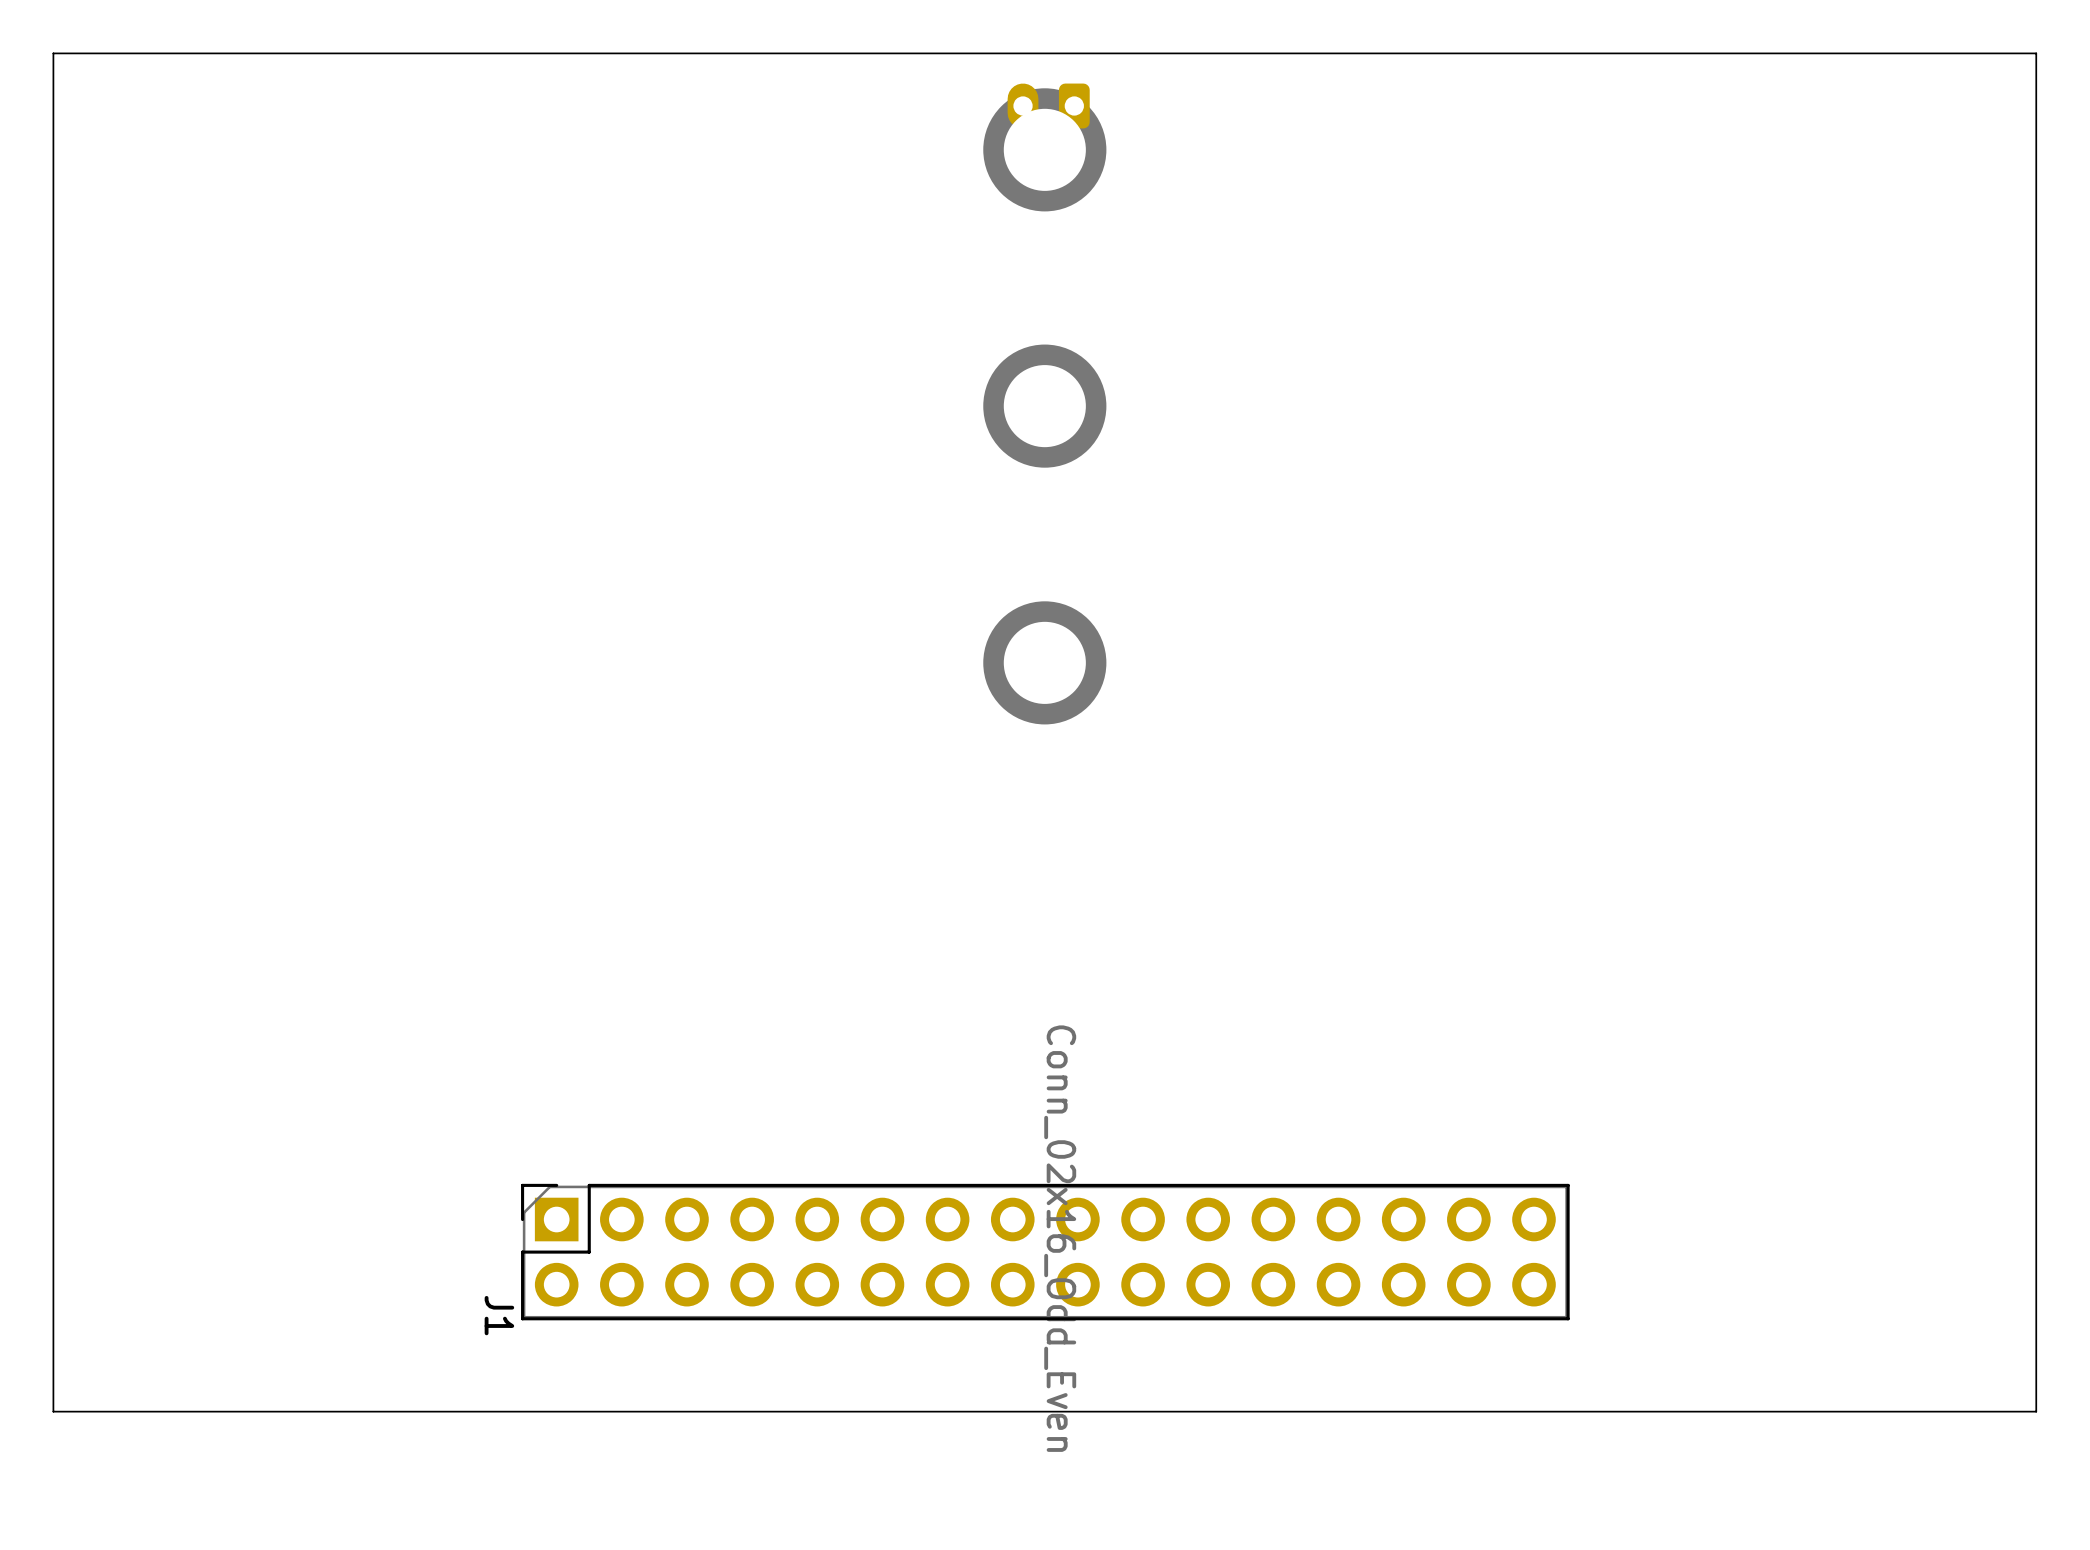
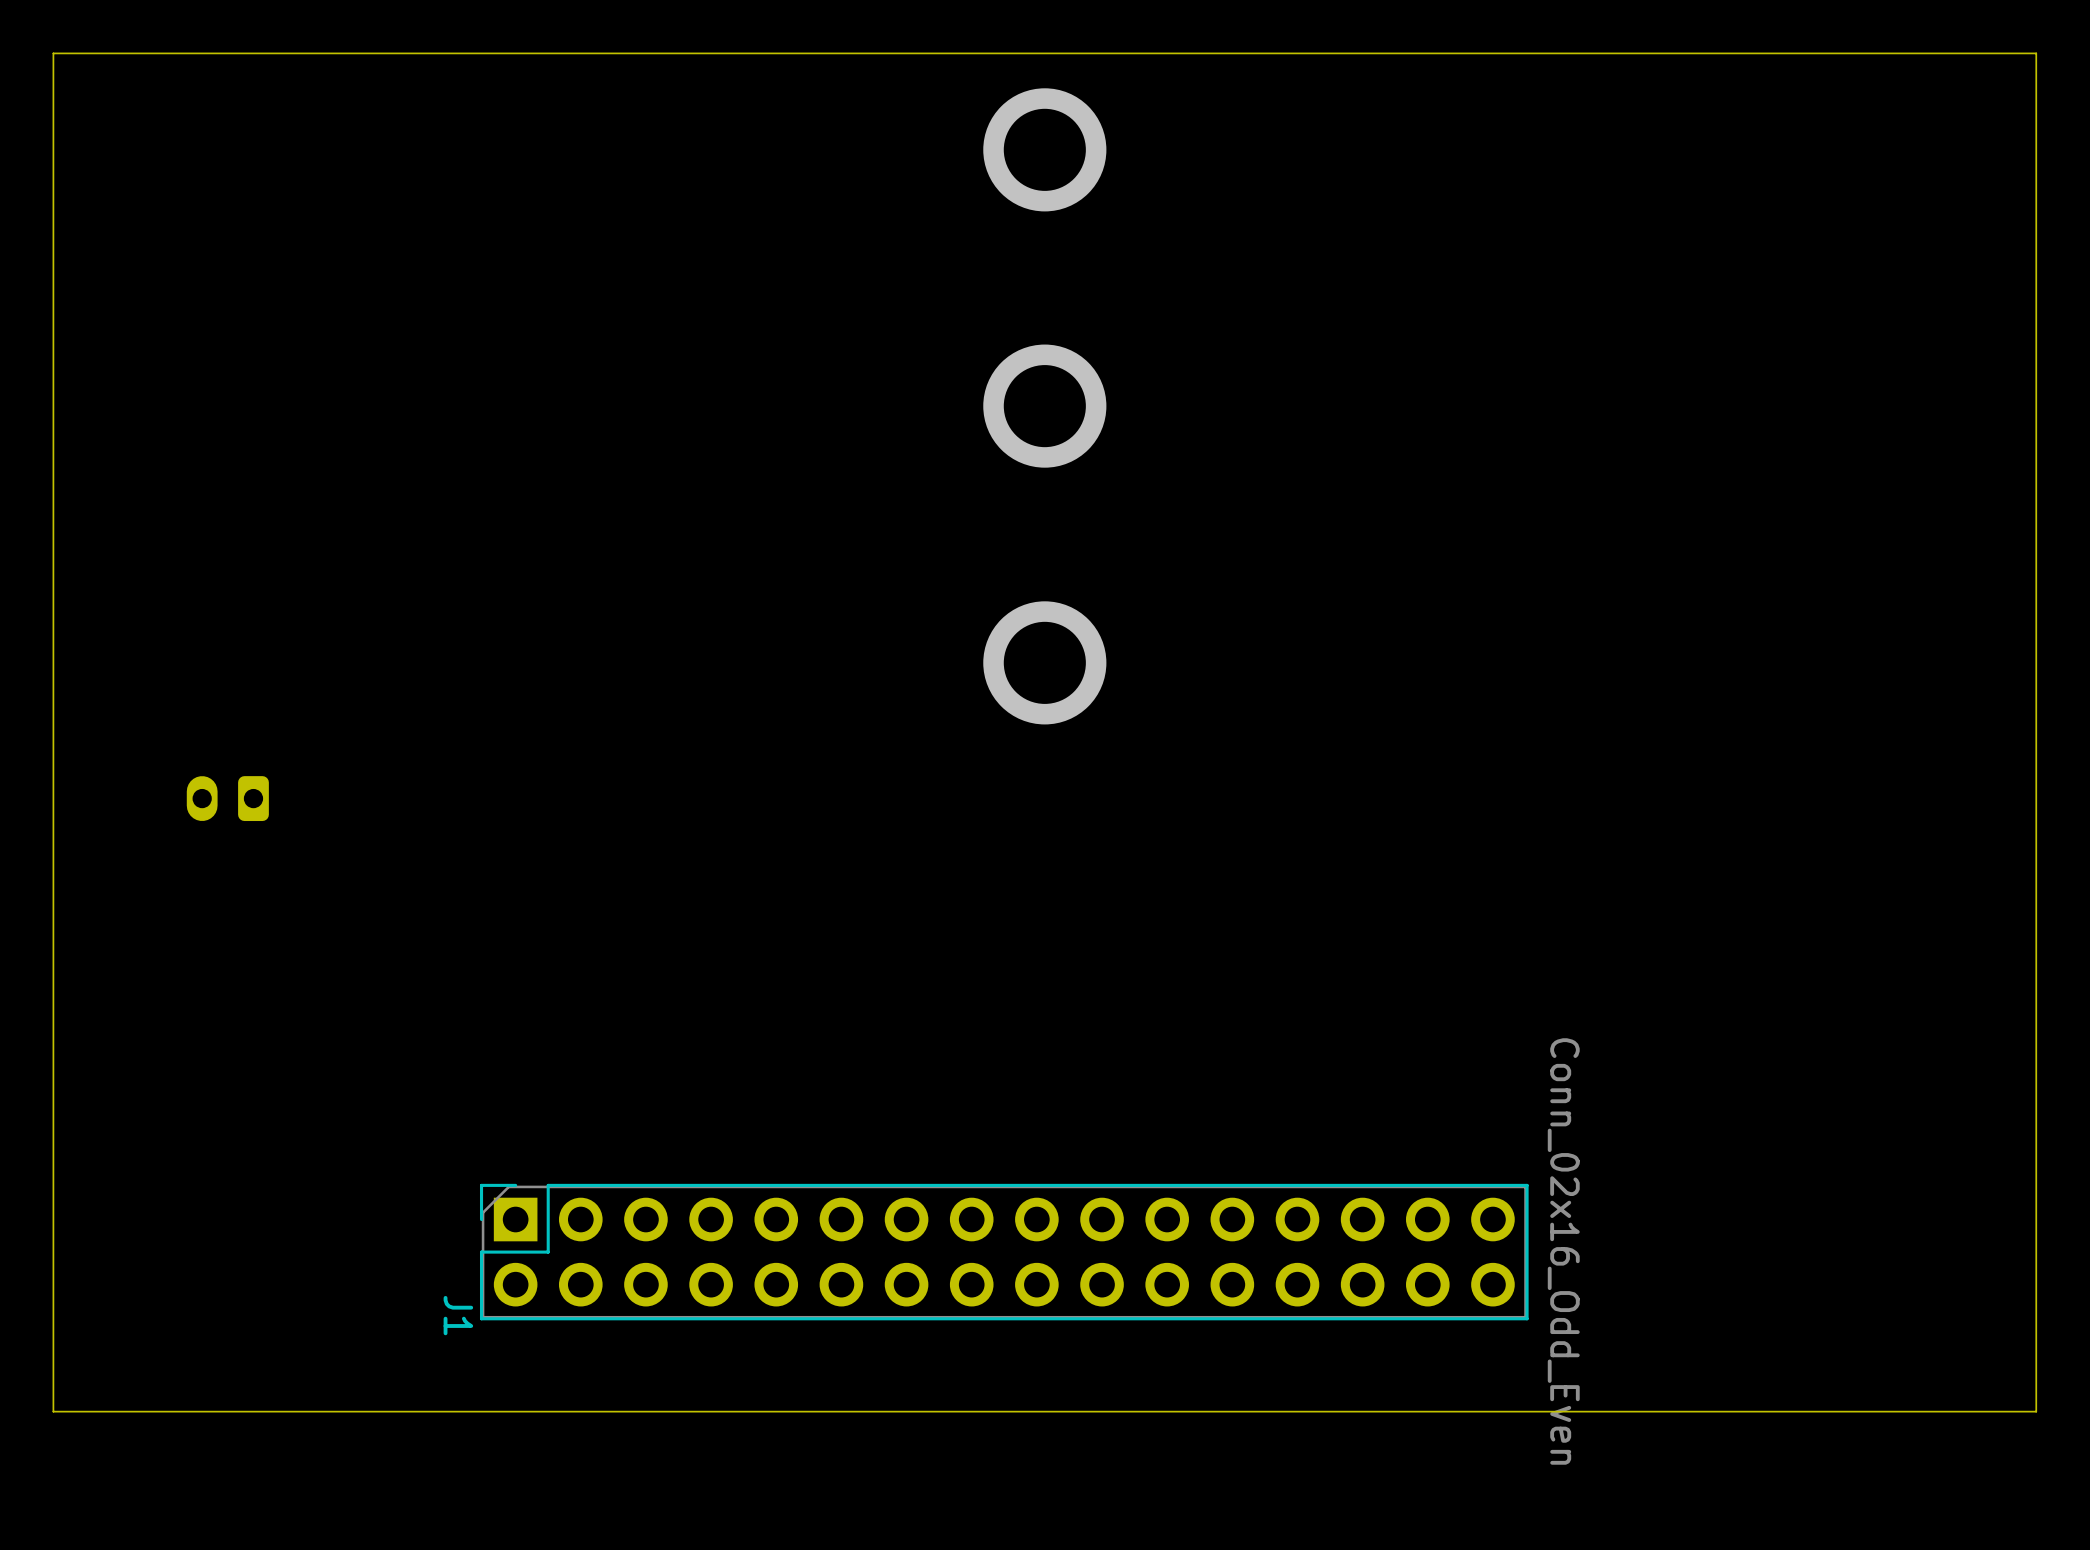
part: (1048, 105) -> none
part: none -> (227, 798)
J1 value position: Conn_02x16_Odd_Even (1060, 1238) -> Conn_02x16_Odd_Even (1563, 1251)
J1 position: (1045, 1252) -> (1004, 1252)

